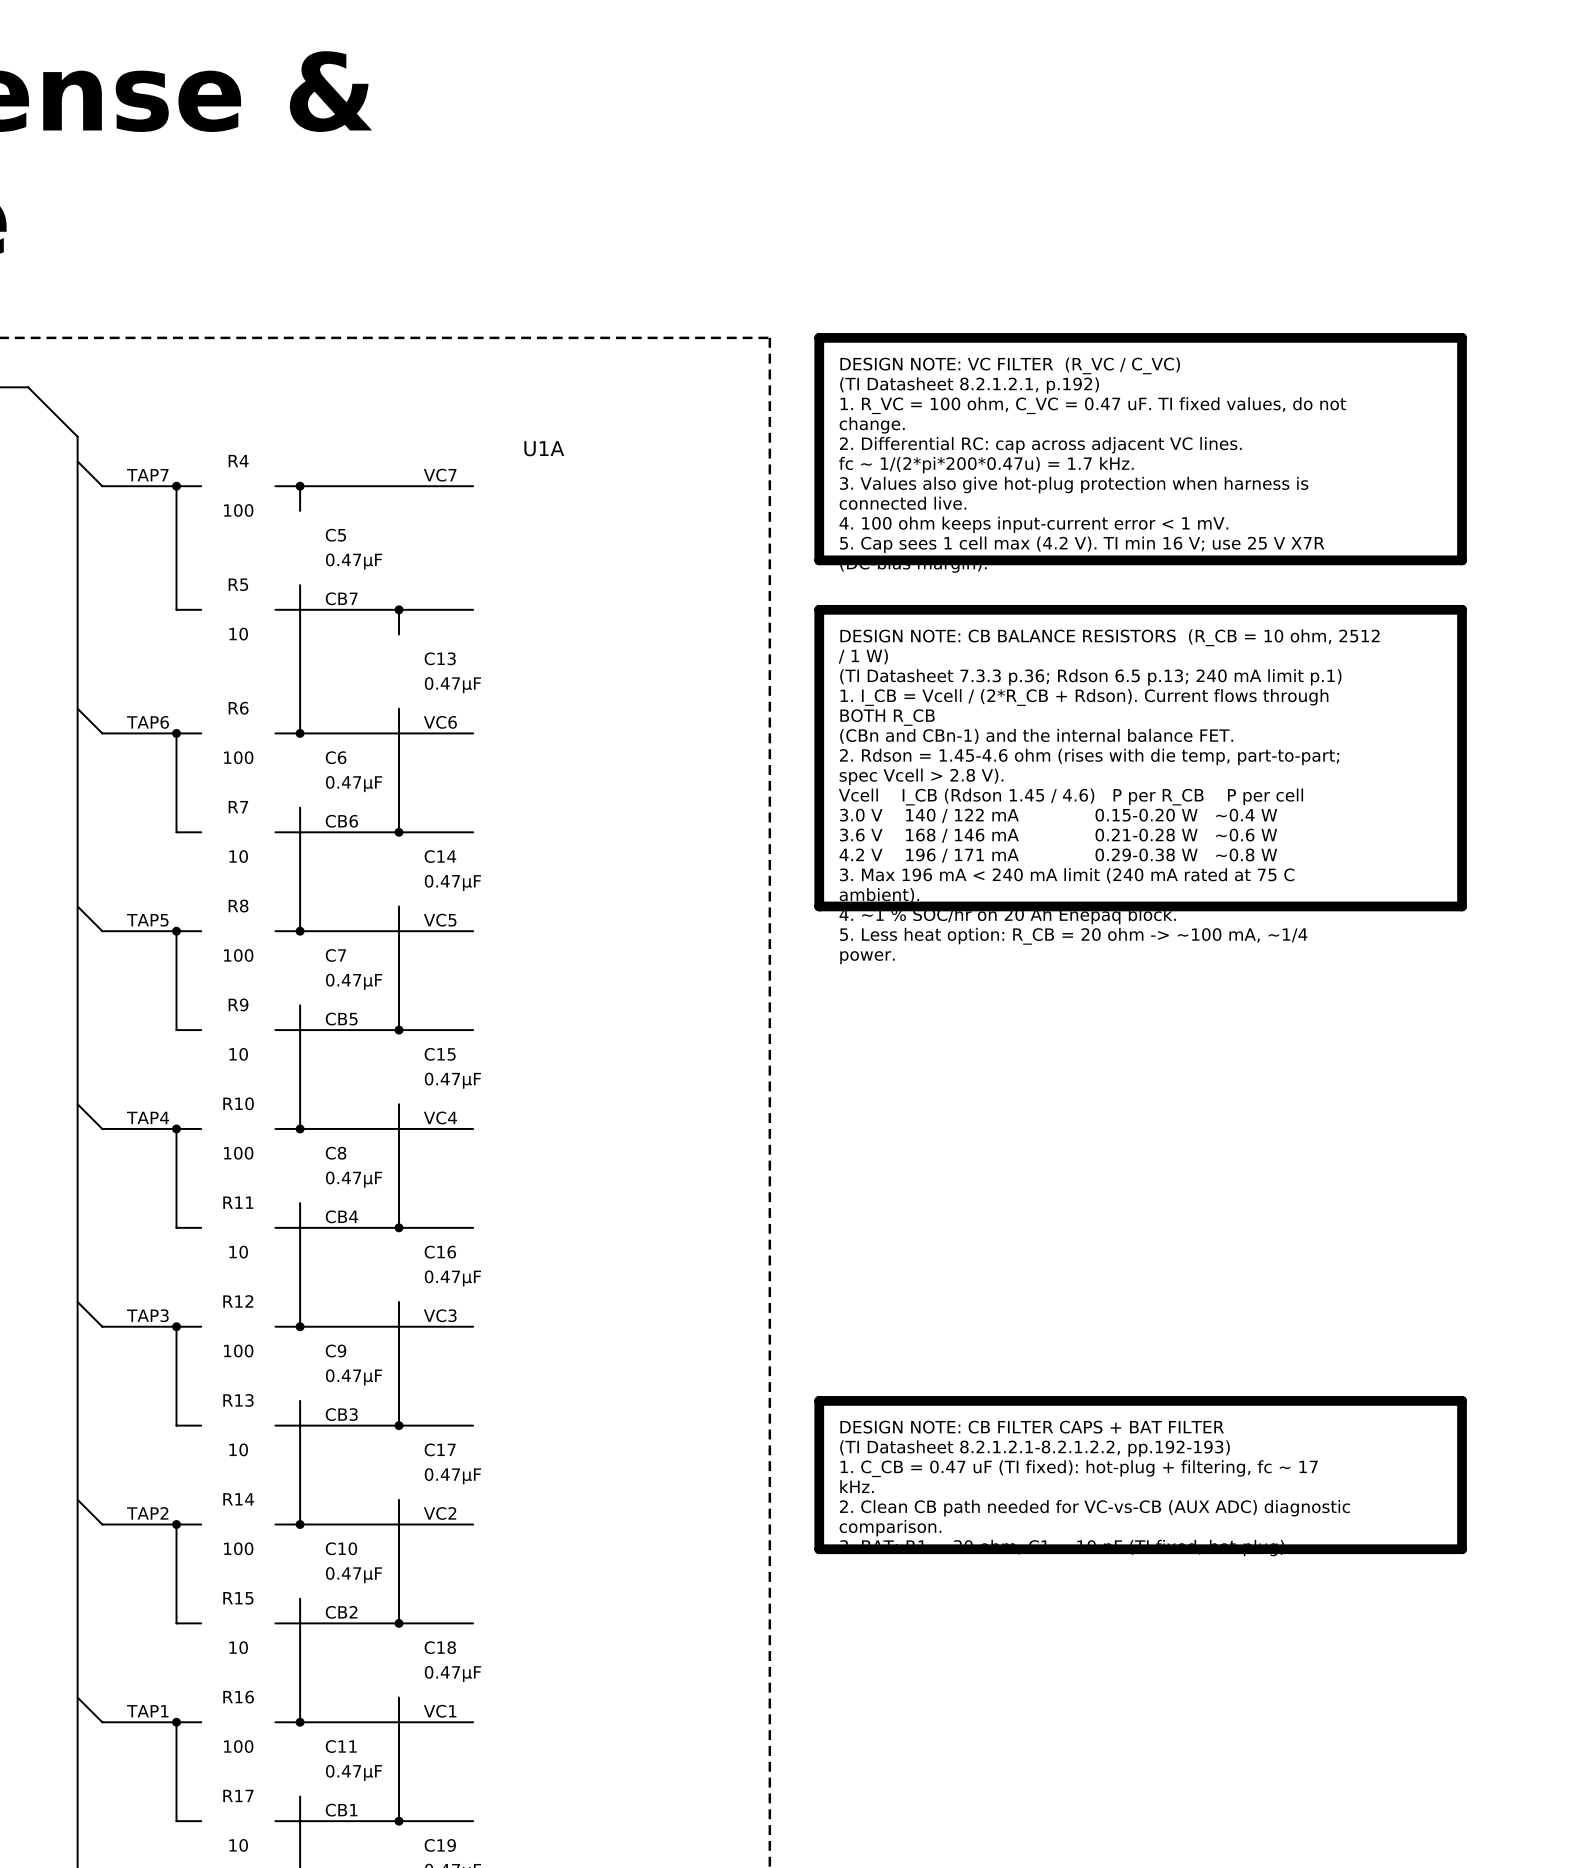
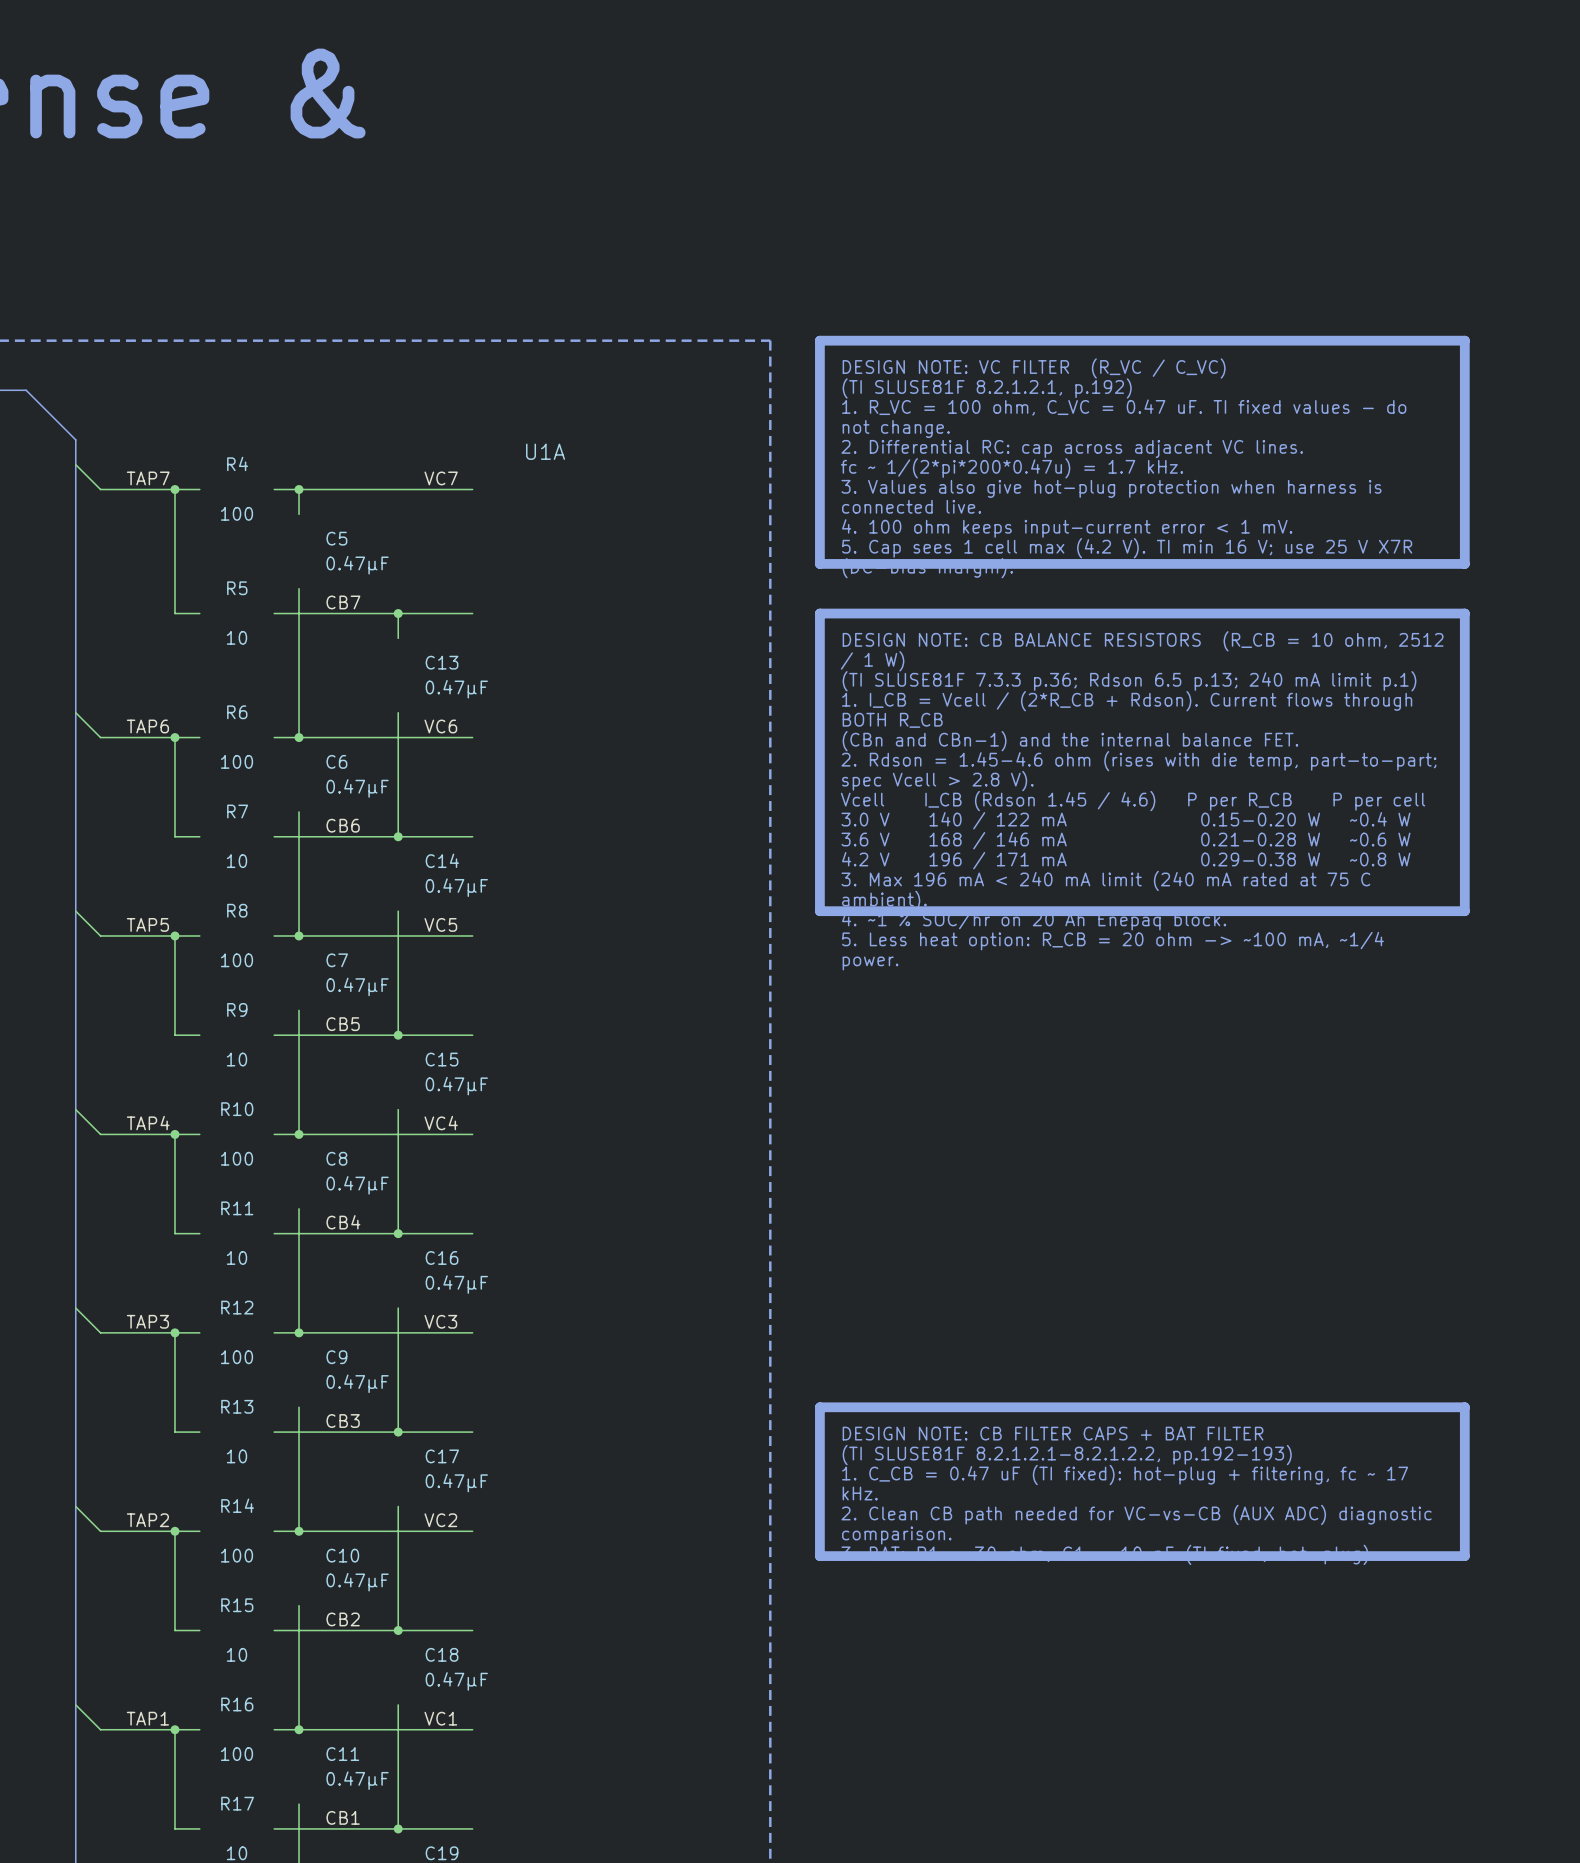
text: (TI Datasheet 8.2.1.2.1, p.192) (969, 385) -> (TI SLUSE81F 8.2.1.2.1, p.192) (987, 388)
text: 1. R_VC = 100 ohm, C_VC = 0.47 uF. TI fixed values, do not (1093, 405) -> 1. R_VC = 100 ohm, C_VC = 0.47 uF. TI fixed values - do (1124, 407)
text: change. (872, 425) -> not change. (896, 428)
text: (TI Datasheet 7.3.3 p.36; Rdson 6.5 p.13; 240 mA limit p.1) (1090, 677) -> (TI SLUSE81F 7.3.3 p.36; Rdson 6.5 p.13; 240 mA limit p.1) (1129, 681)
text: (TI Datasheet 8.2.1.2.1-8.2.1.2.2, pp.192-193) (1035, 1448) -> (TI SLUSE81F 8.2.1.2.1-8.2.1.2.2, pp.192-193) (1067, 1455)

